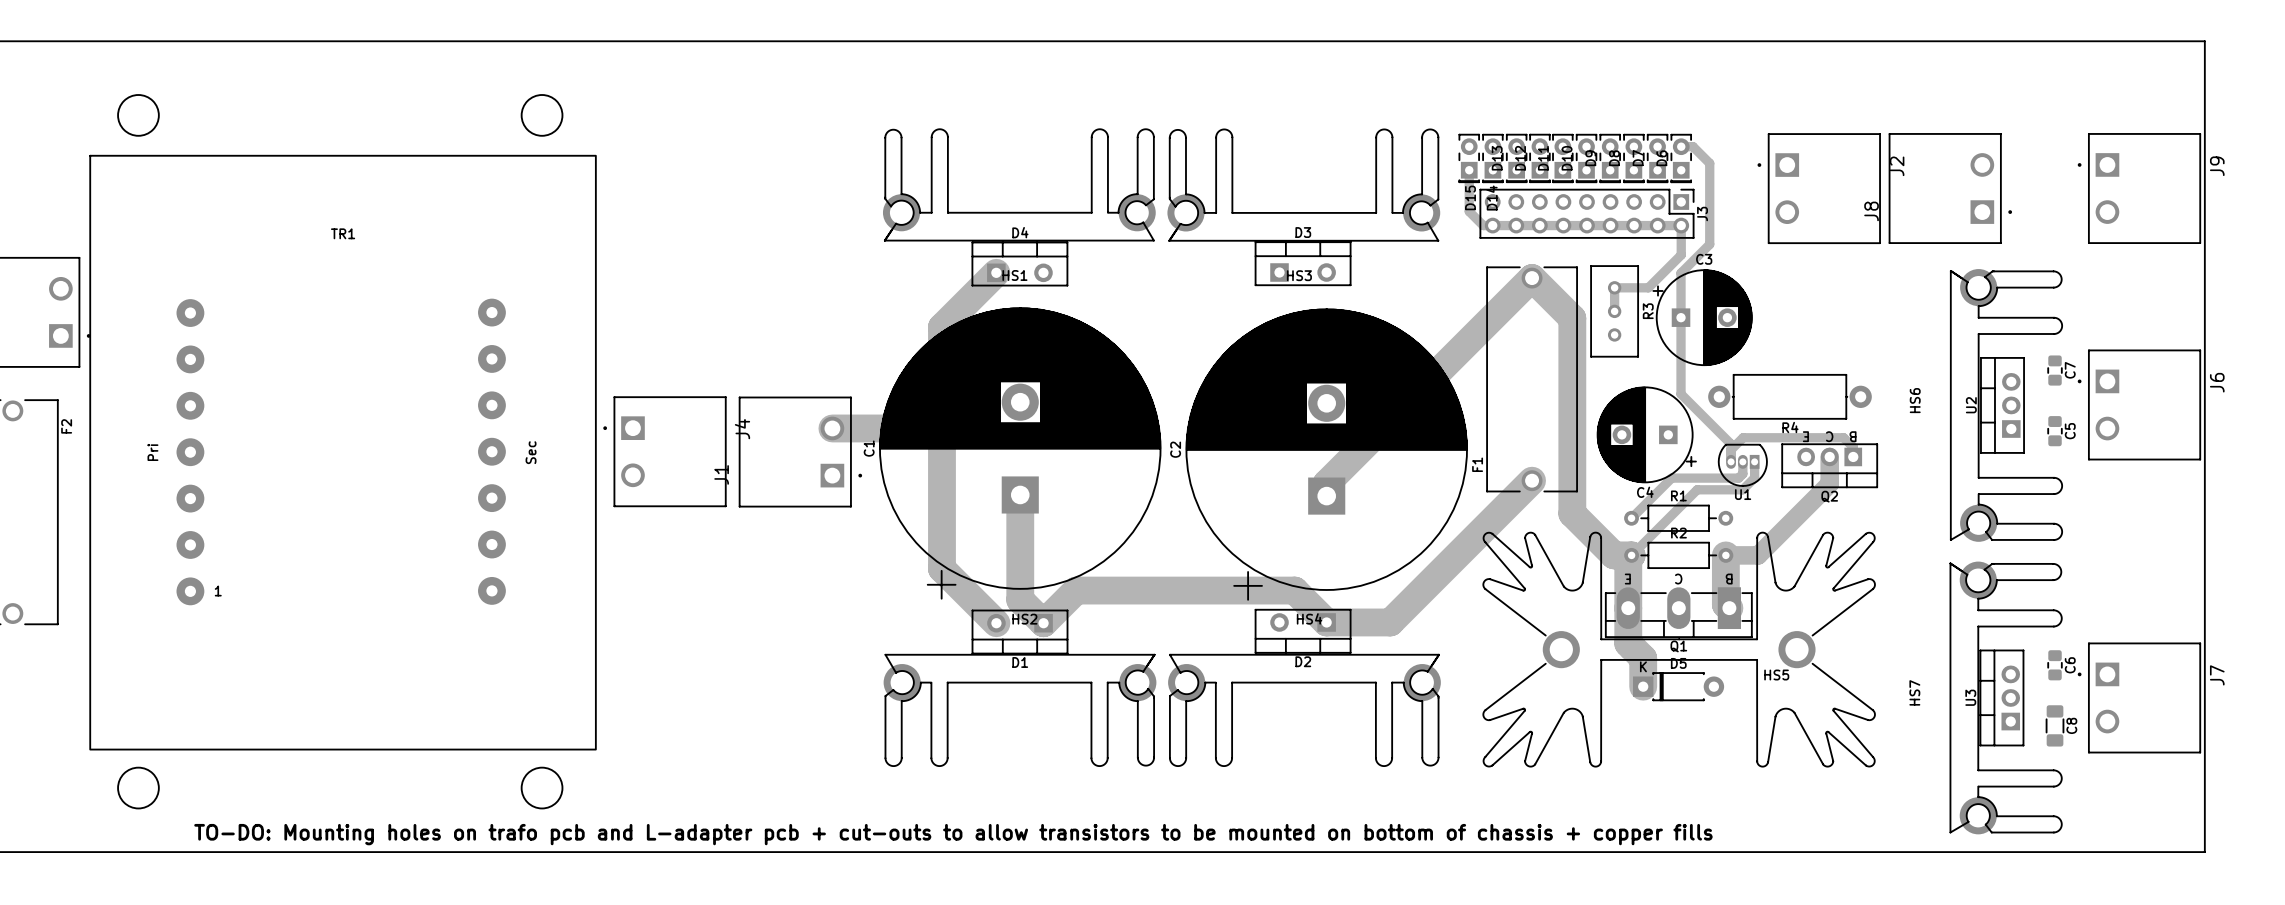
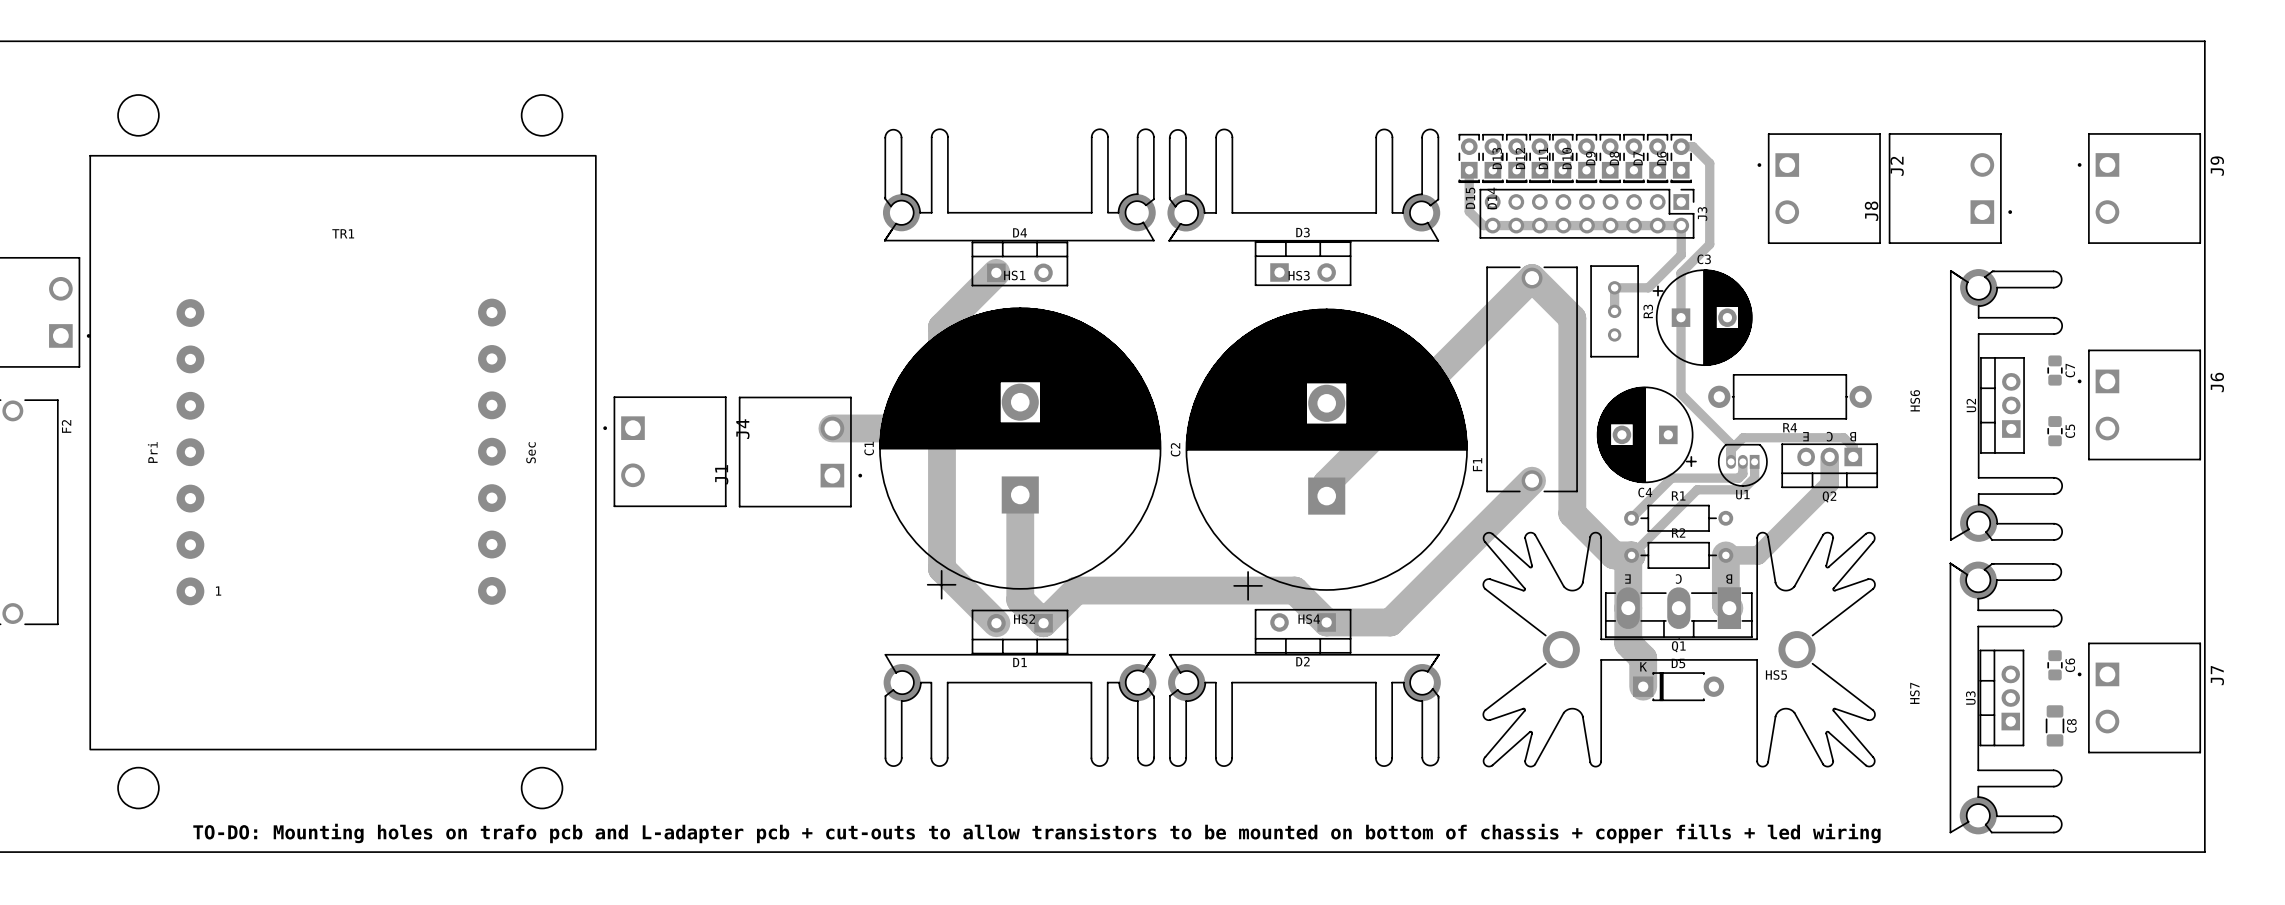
text: TO-DO: Mounting holes on trafo pcb and L-adapter pcb + cut-outs to allow transistors to be mounted on bottom of chassis + copper fills (953, 834) -> TO-DO: Mounting holes on trafo pcb and L-adapter pcb + cut-outs to allow transistors to be mounted on bottom of chassis + copper fills + led wiring (1036, 833)

